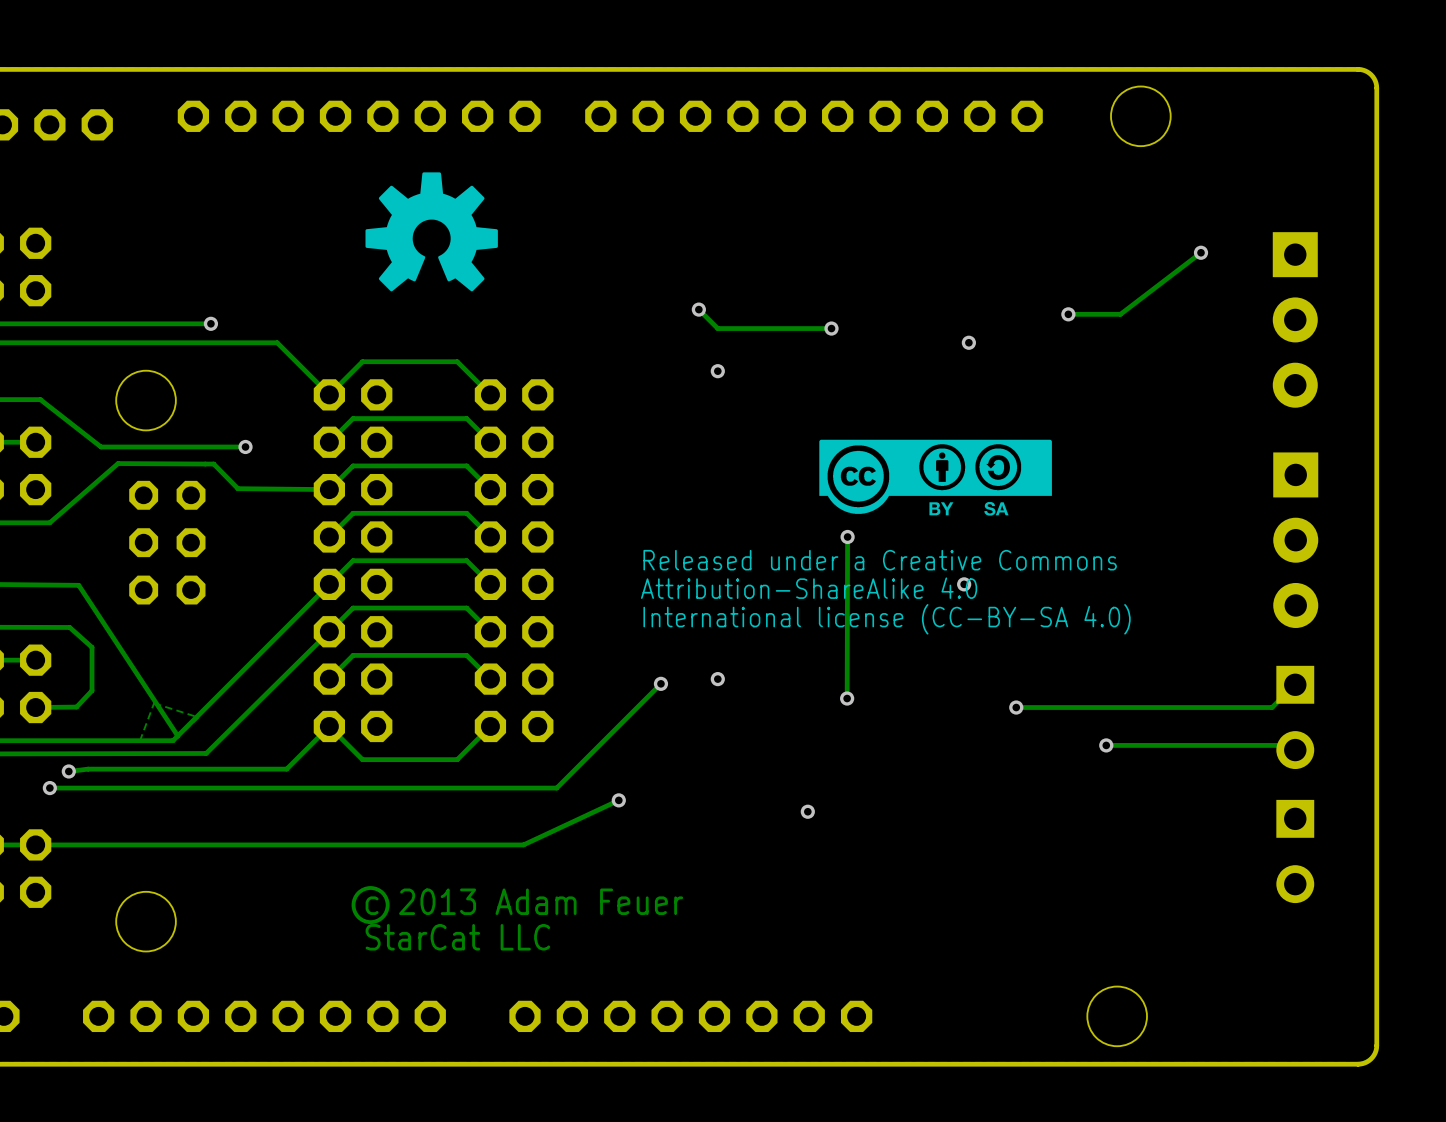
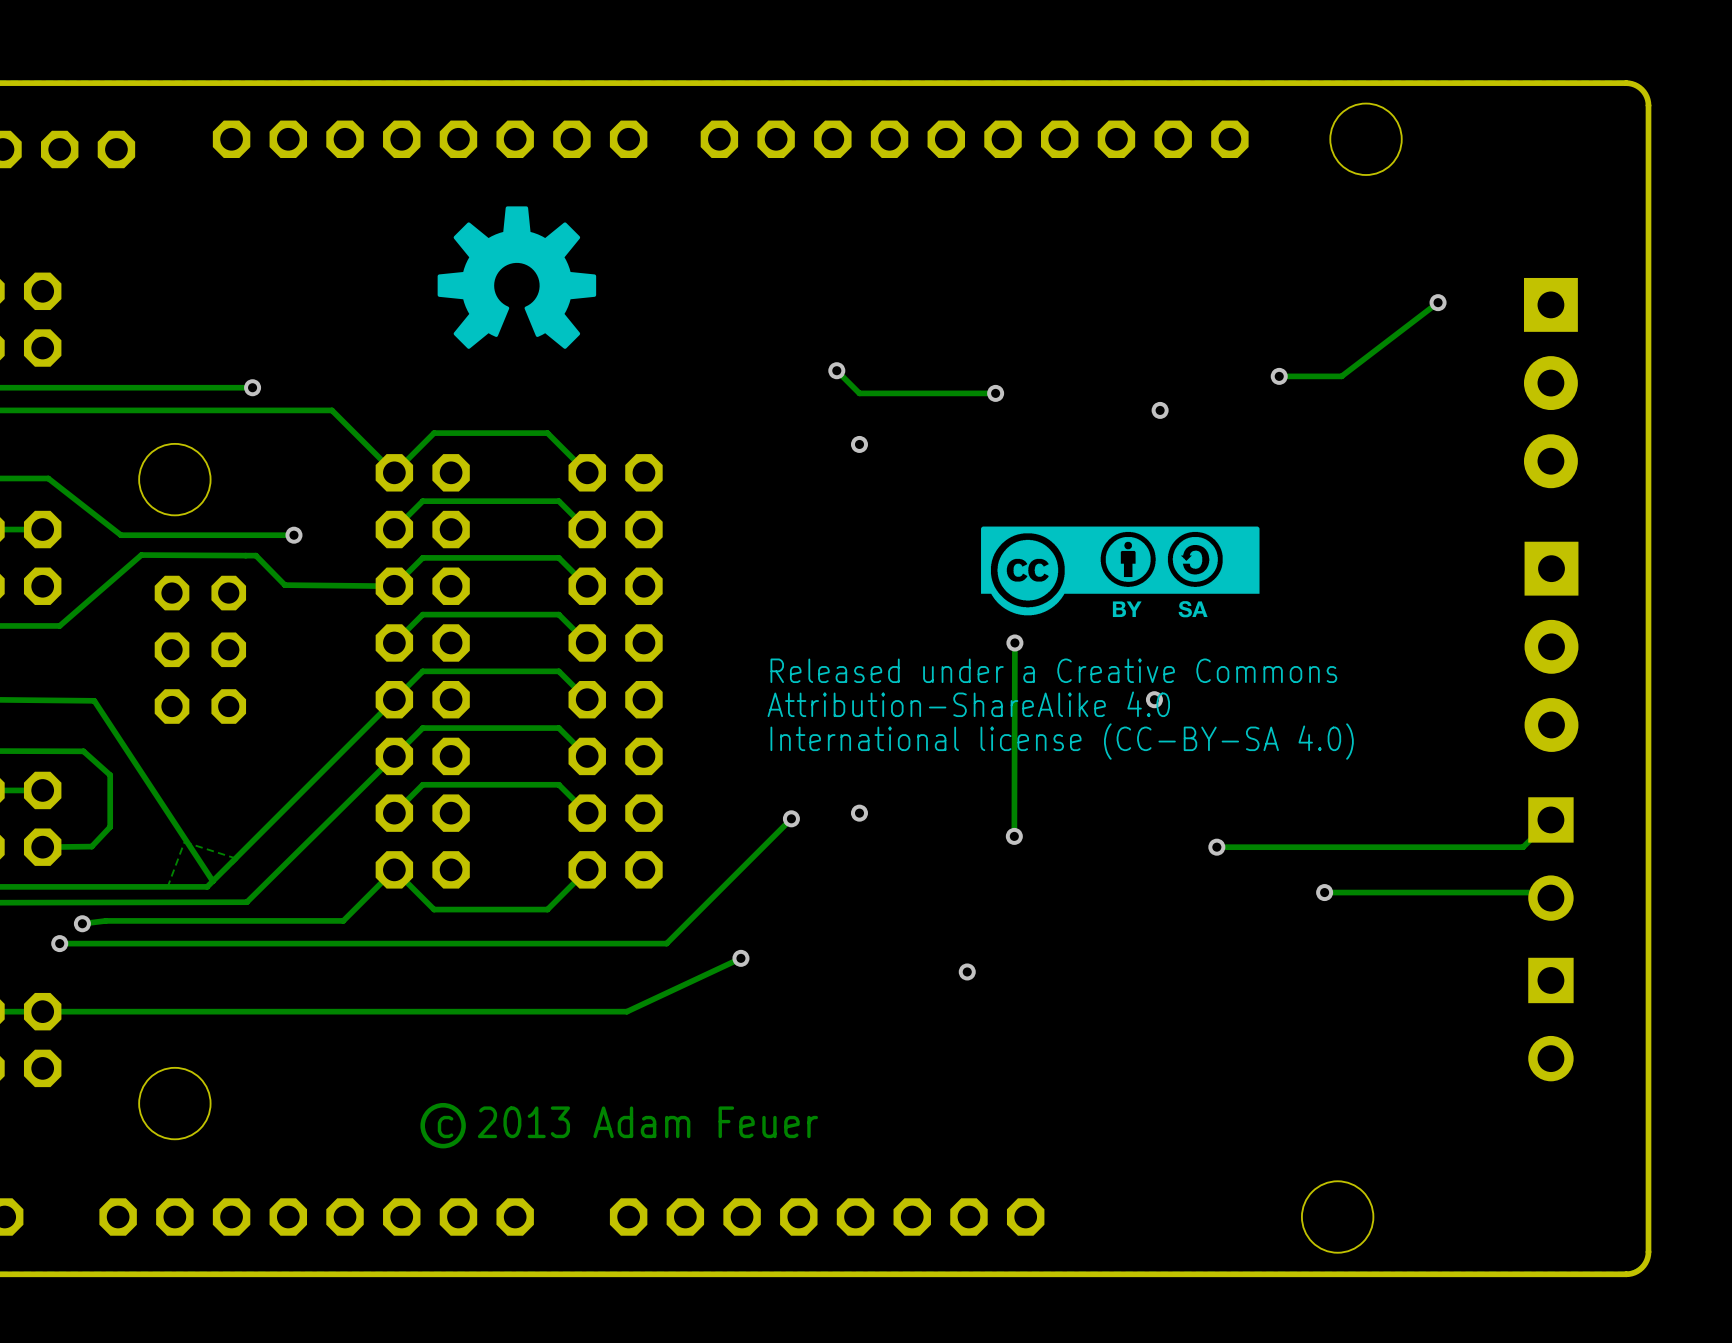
text: c 2013 Adam Feuer (524, 901) -> none
drawing position: (370, 905) -> (443, 1125)
text: StarCat LLC (457, 937) -> c 2013 Adam Feuer (627, 1122)

